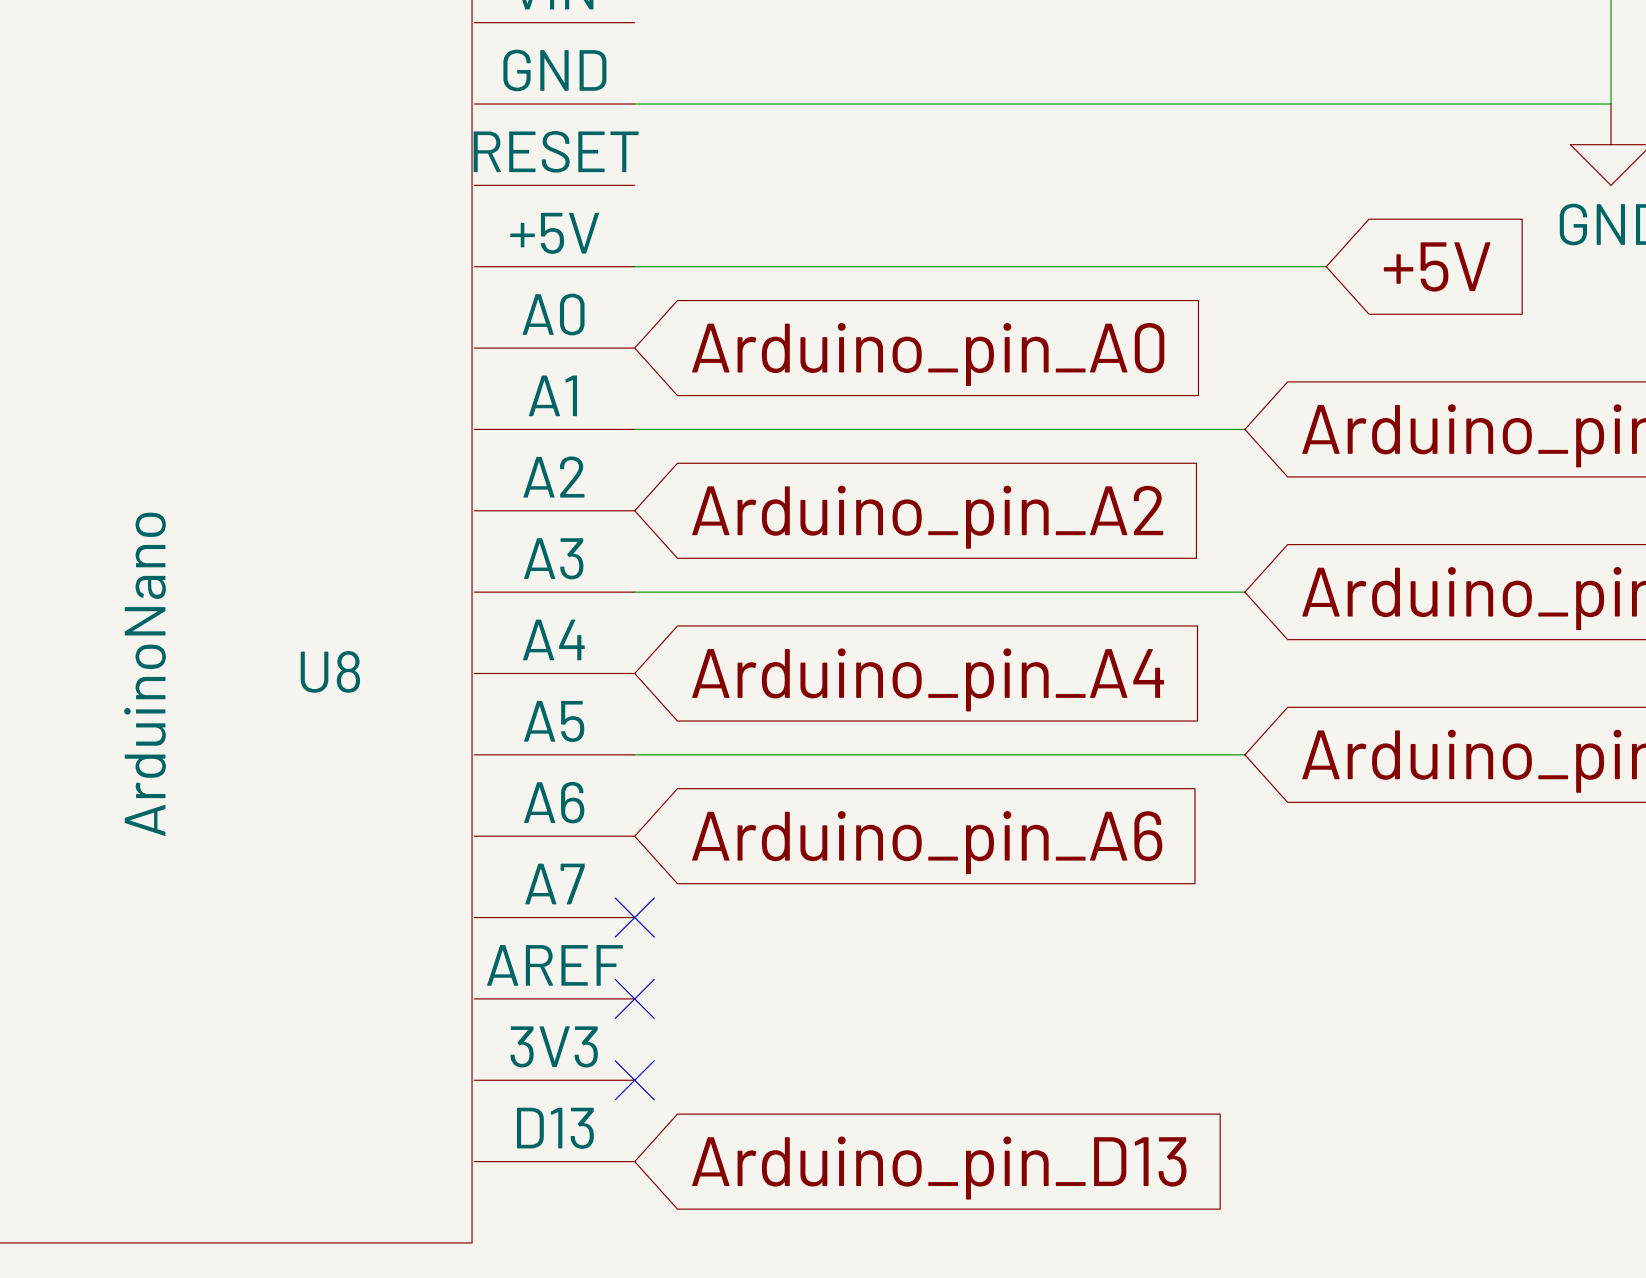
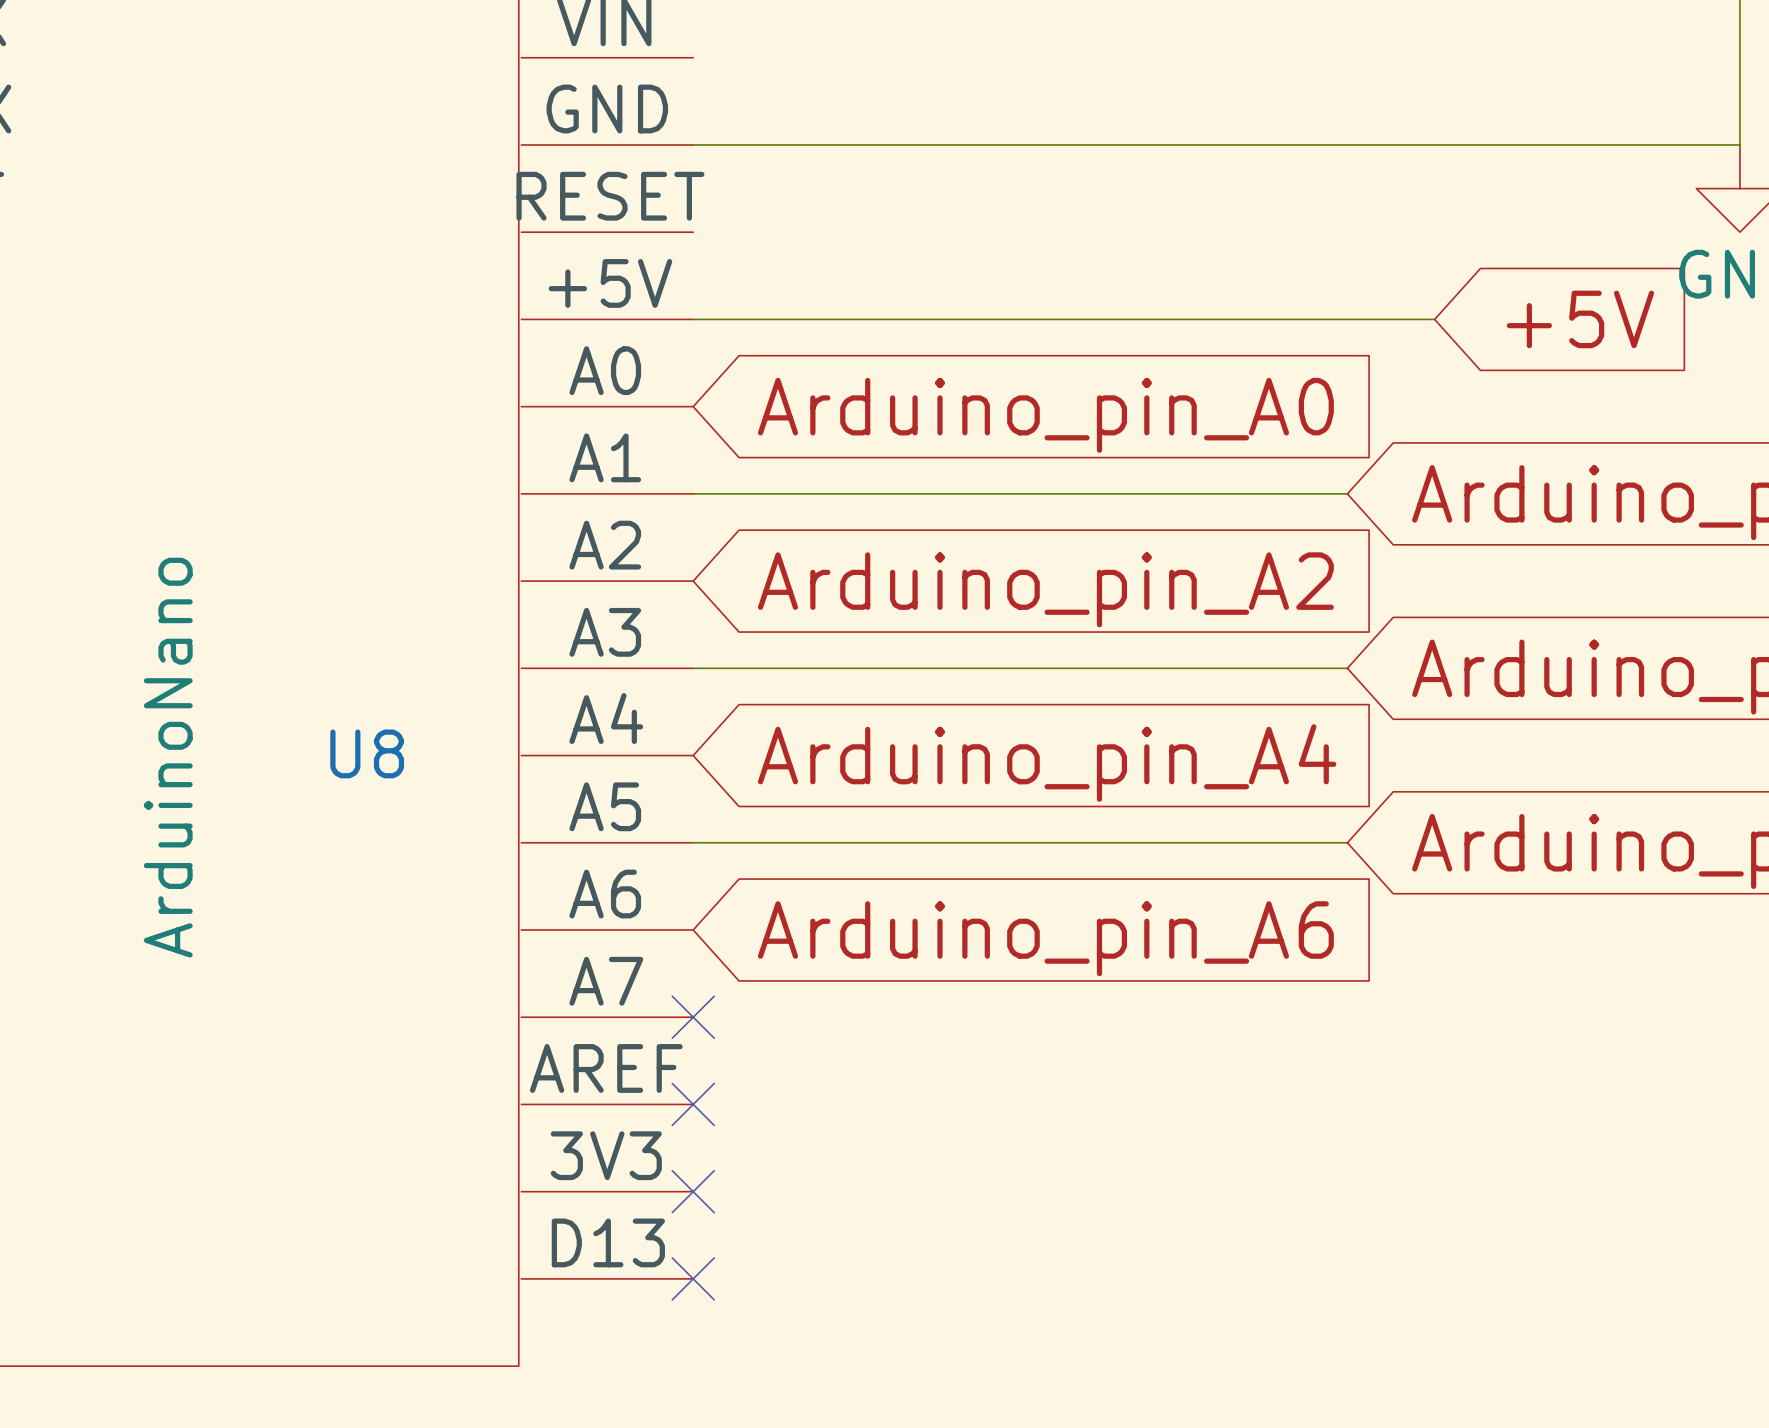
no-connect mark: none -> (693, 1278)
global label: Arduino_pin_D13 (939, 1168) -> none

